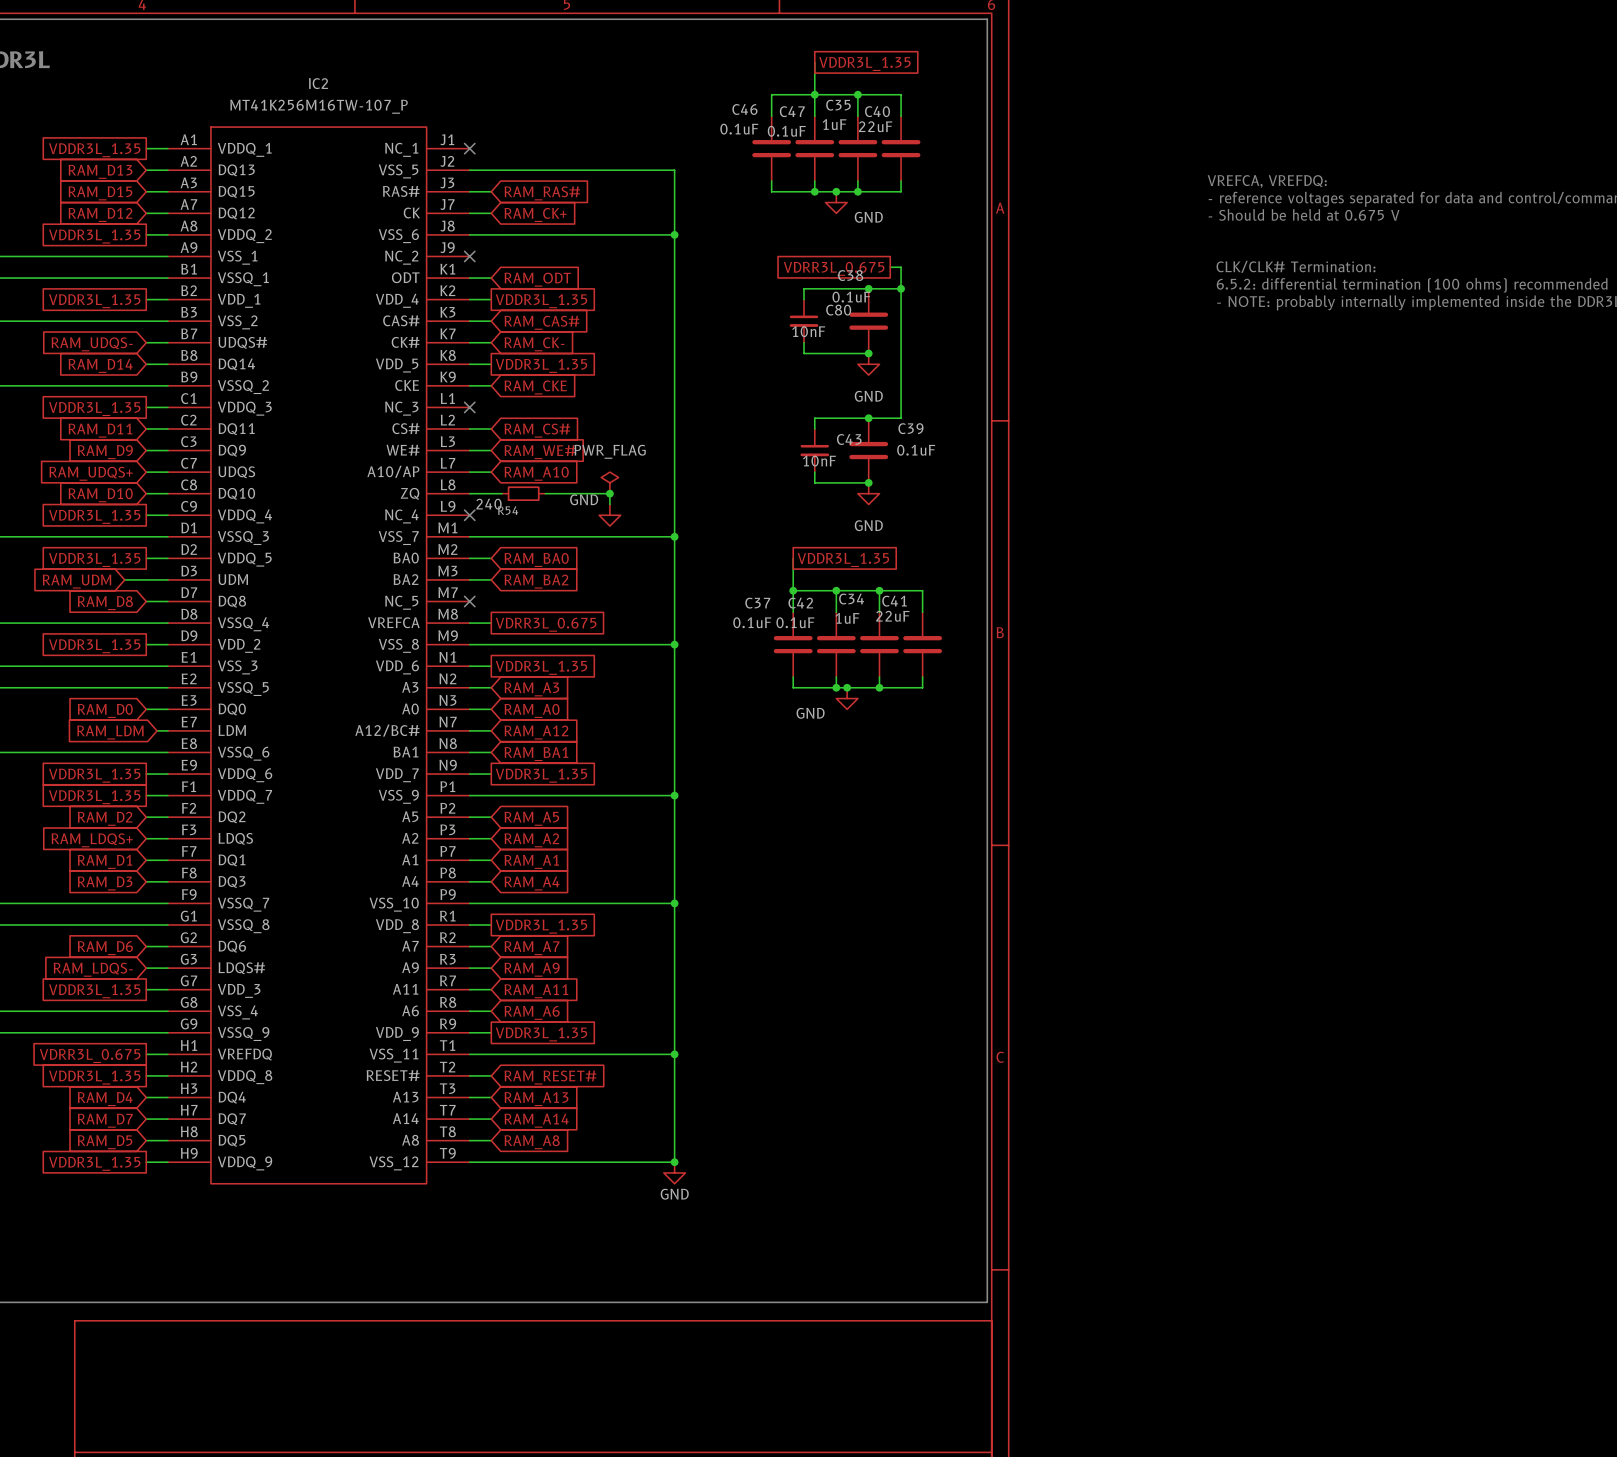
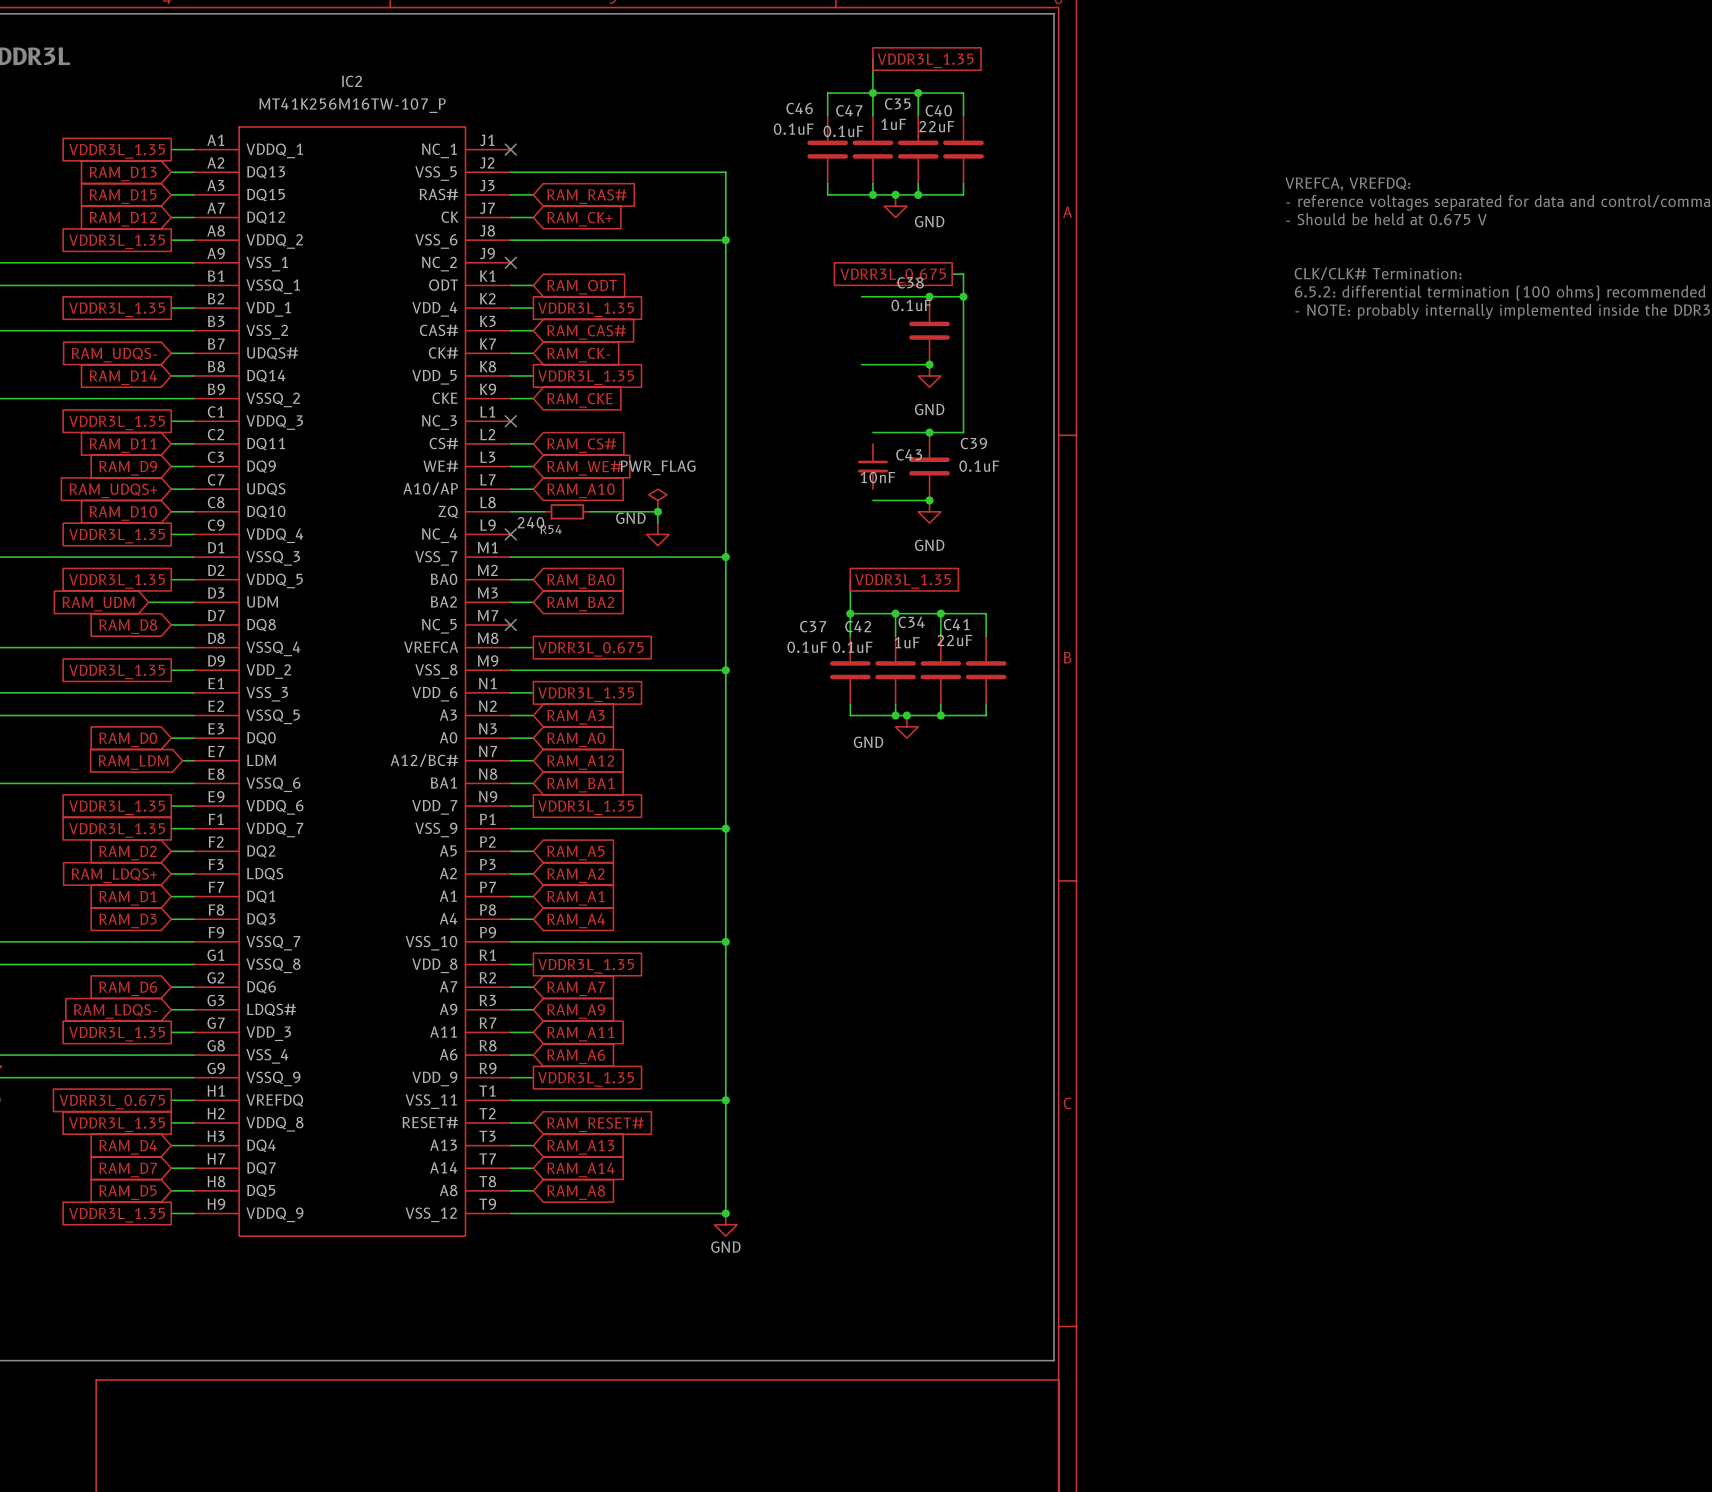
wire: (804, 288) (804, 299) -> none
C80: 10nF (804, 321) -> none
wire: (804, 342) (804, 353) -> none
wire: (814, 418) (814, 428) -> none
wire: (814, 472) (814, 482) -> none

